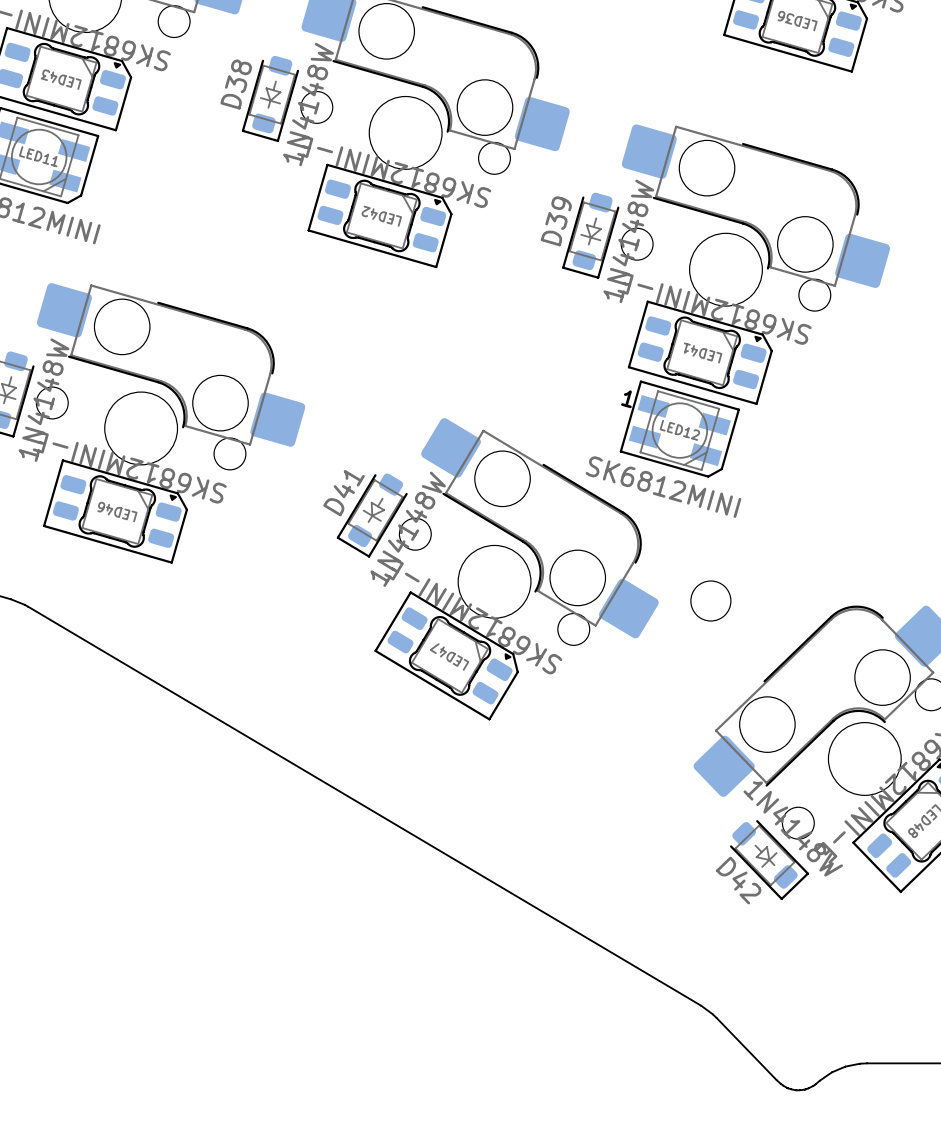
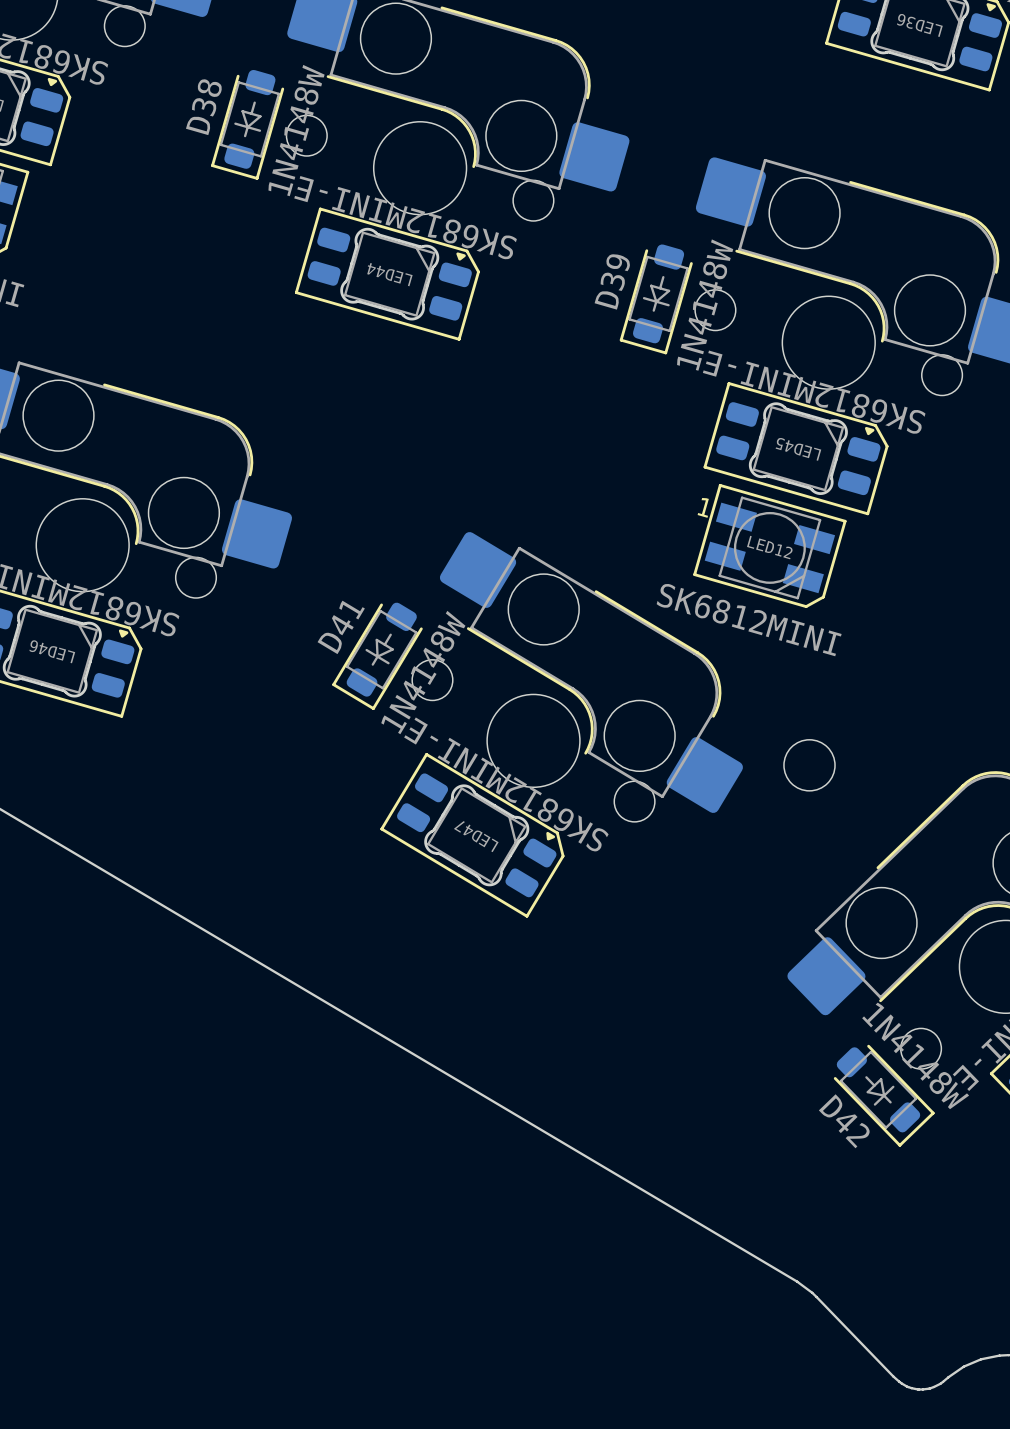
LED42 name: LED42 (381, 216) -> LED44 (389, 274)
LED41 name: LED41 (703, 353) -> LED45 (798, 449)

